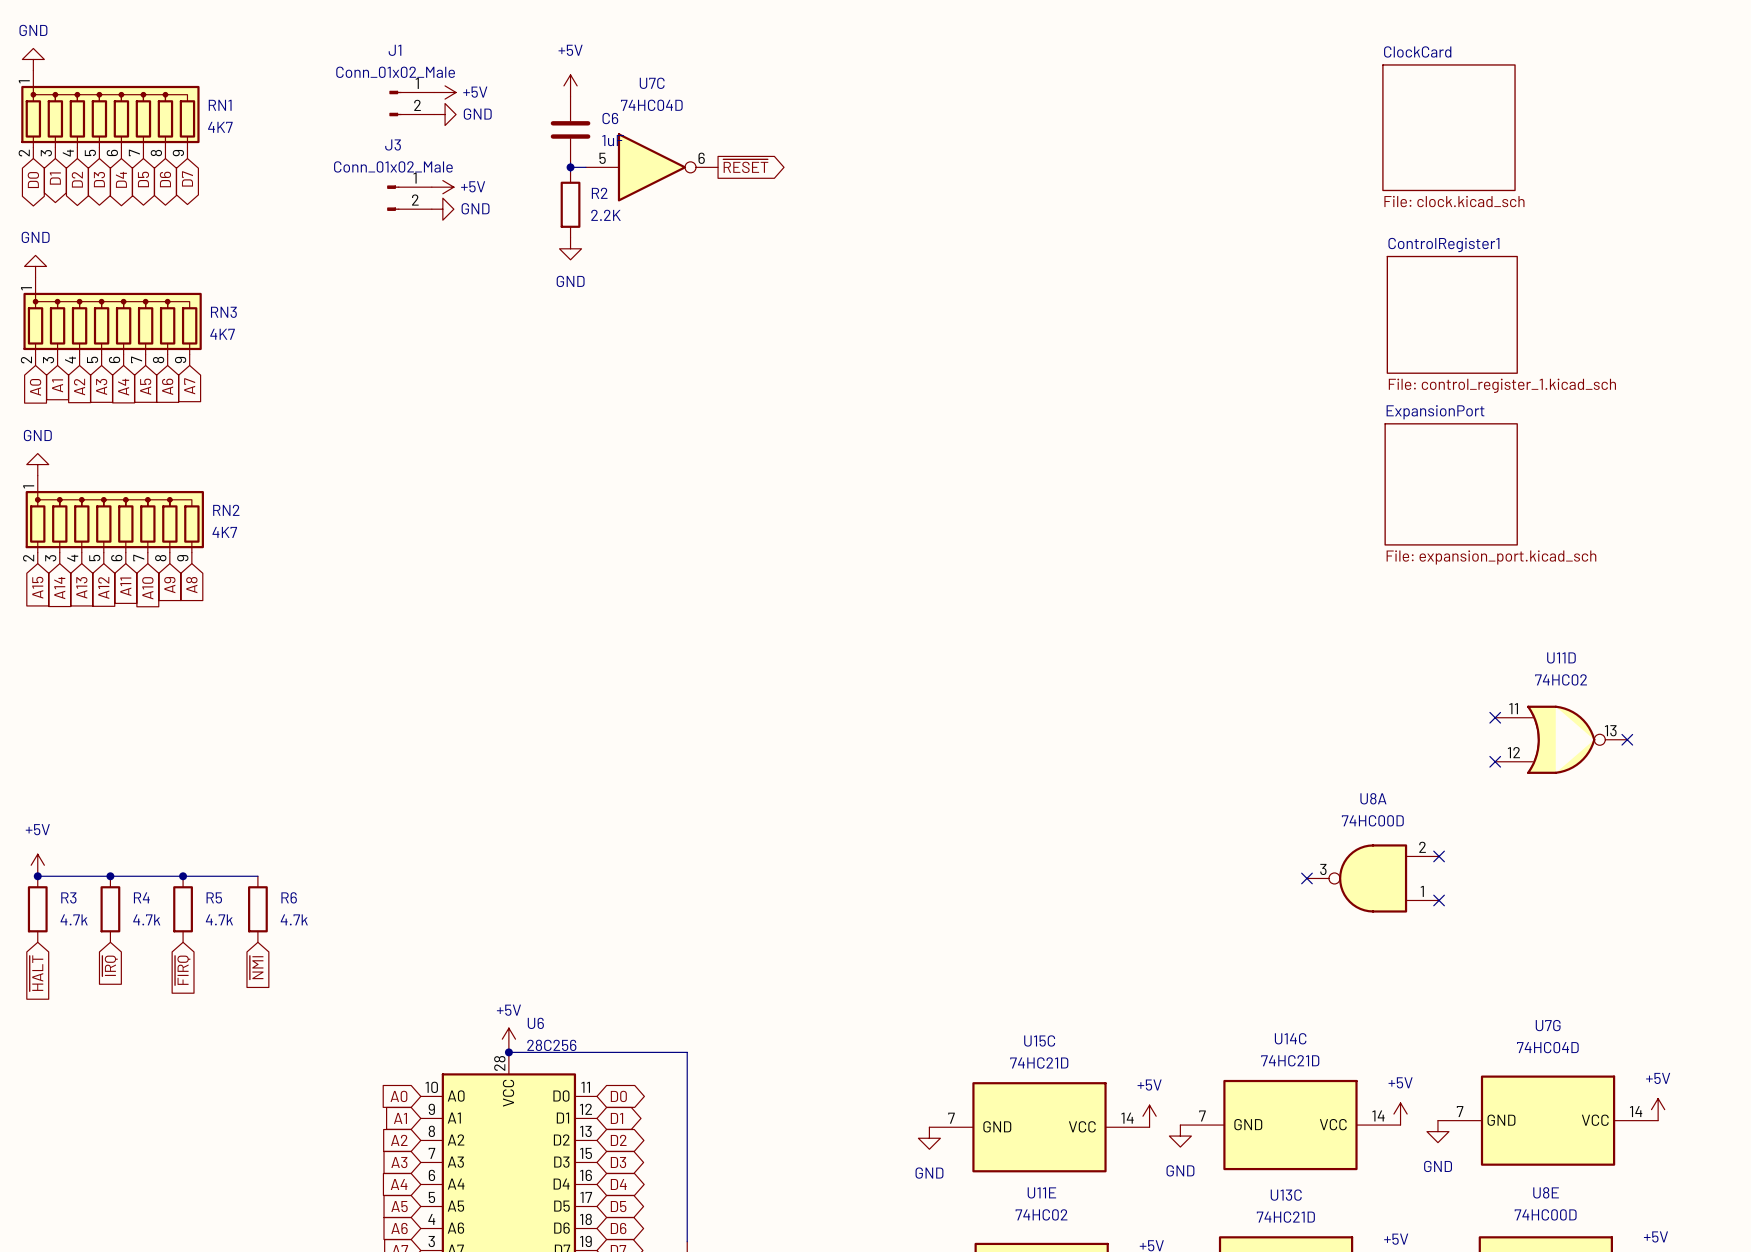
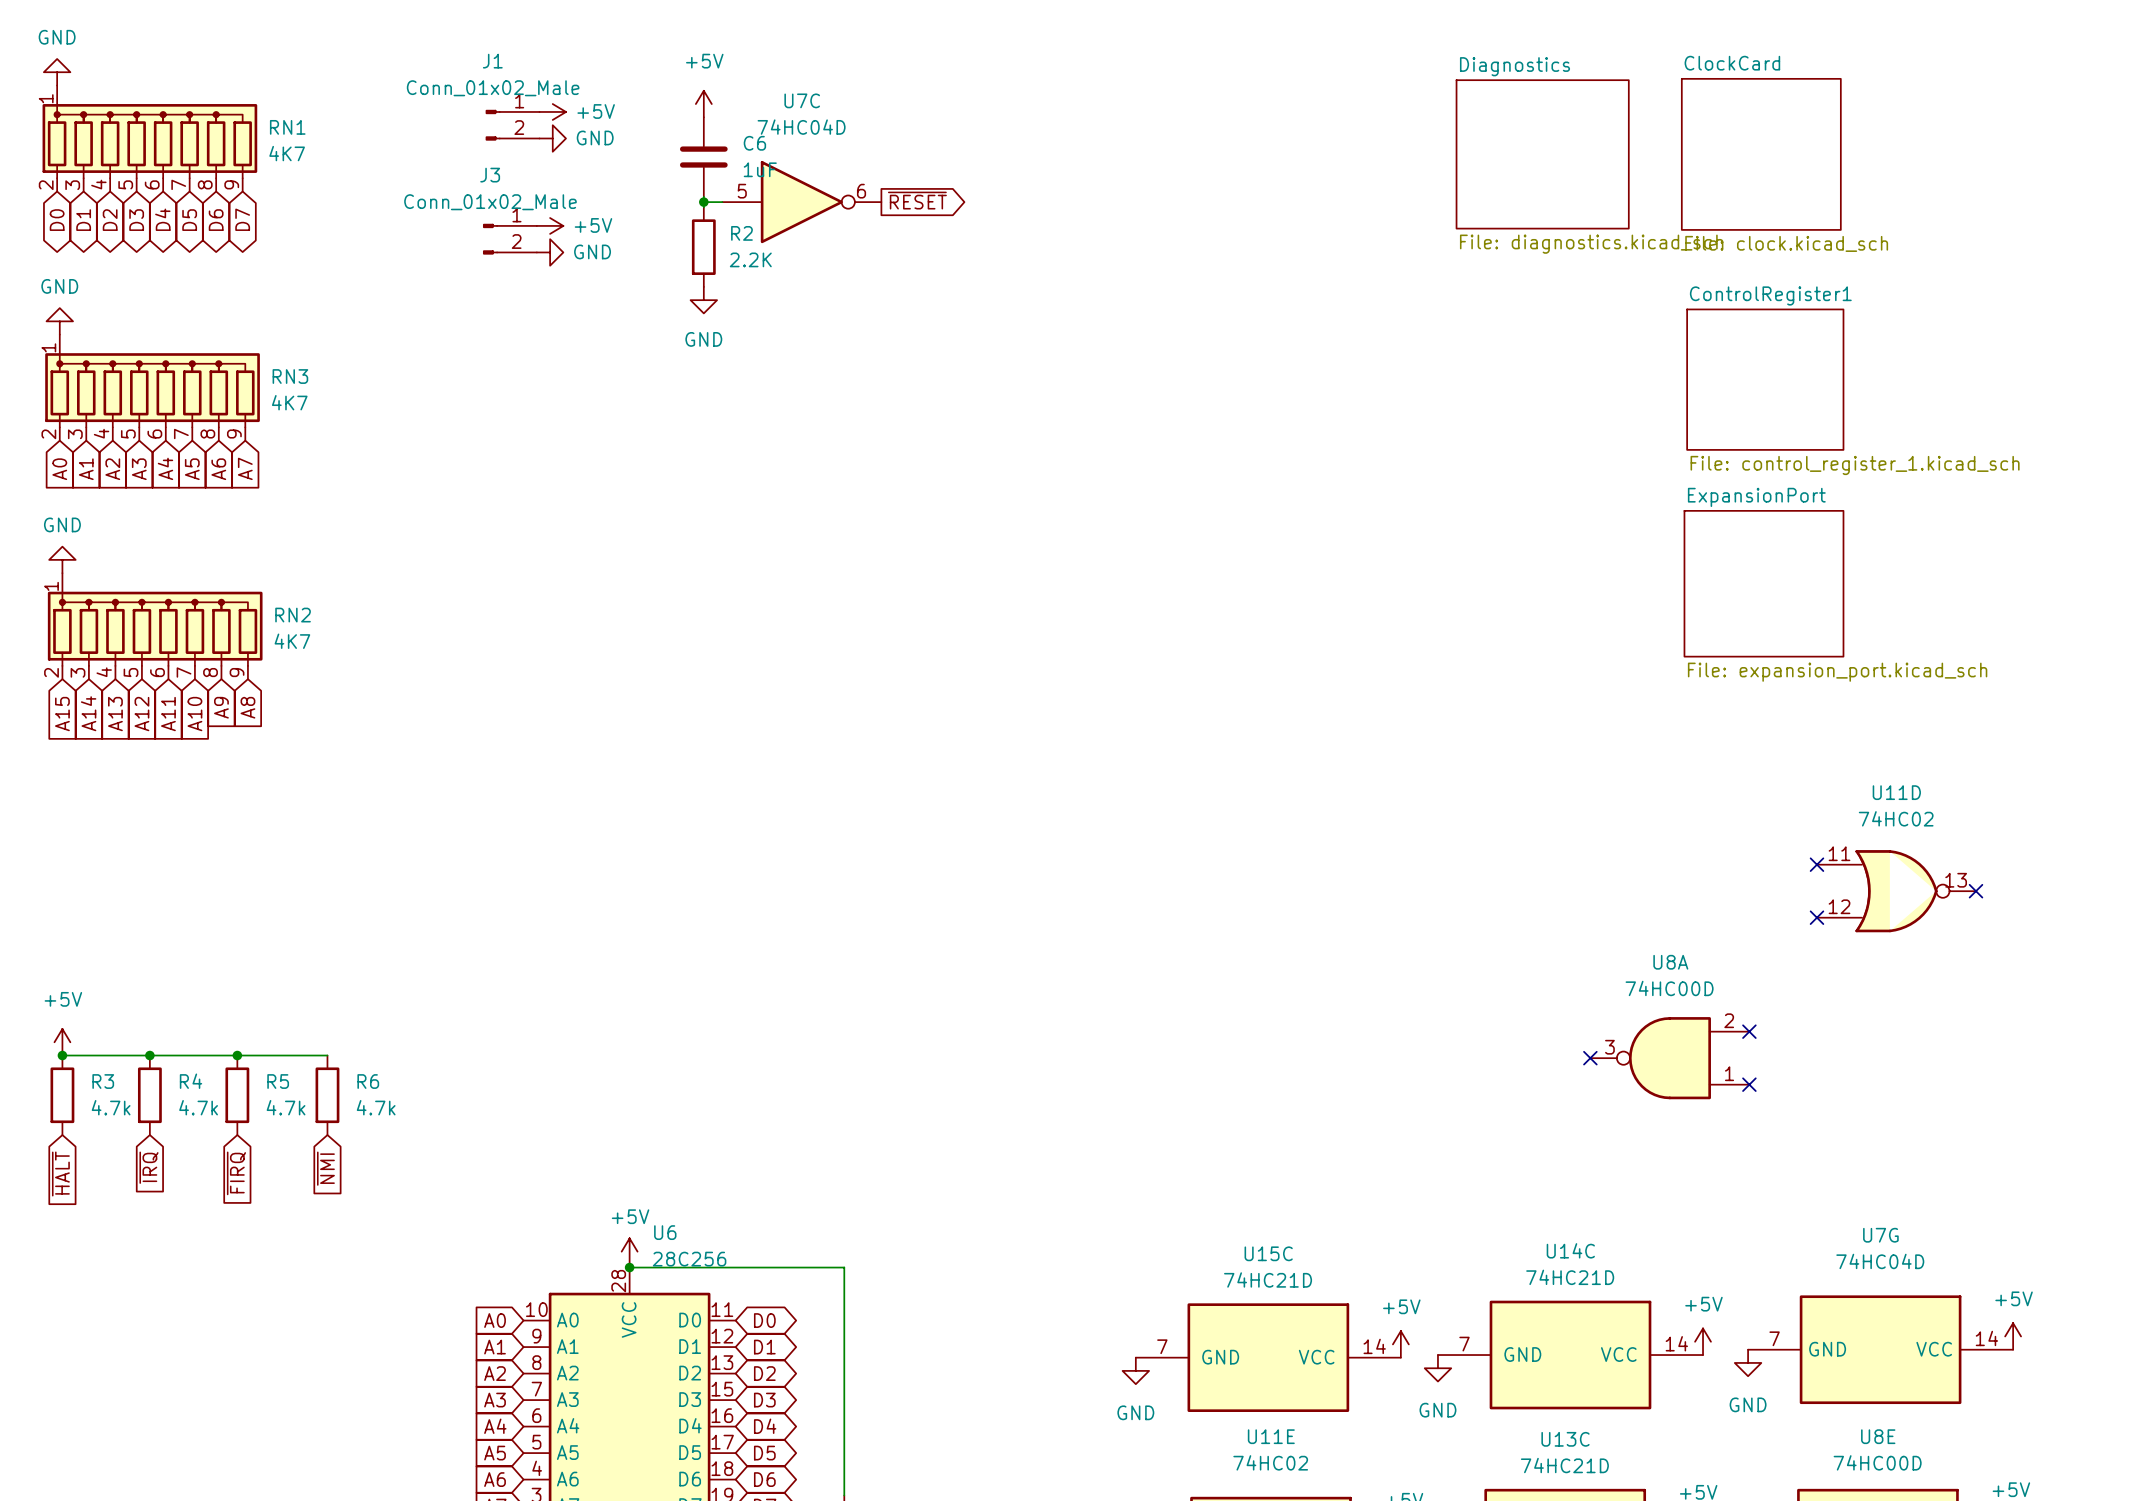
sheet Diagnostics: none -> File: diagnostics.kicad_sch (1542, 154)

